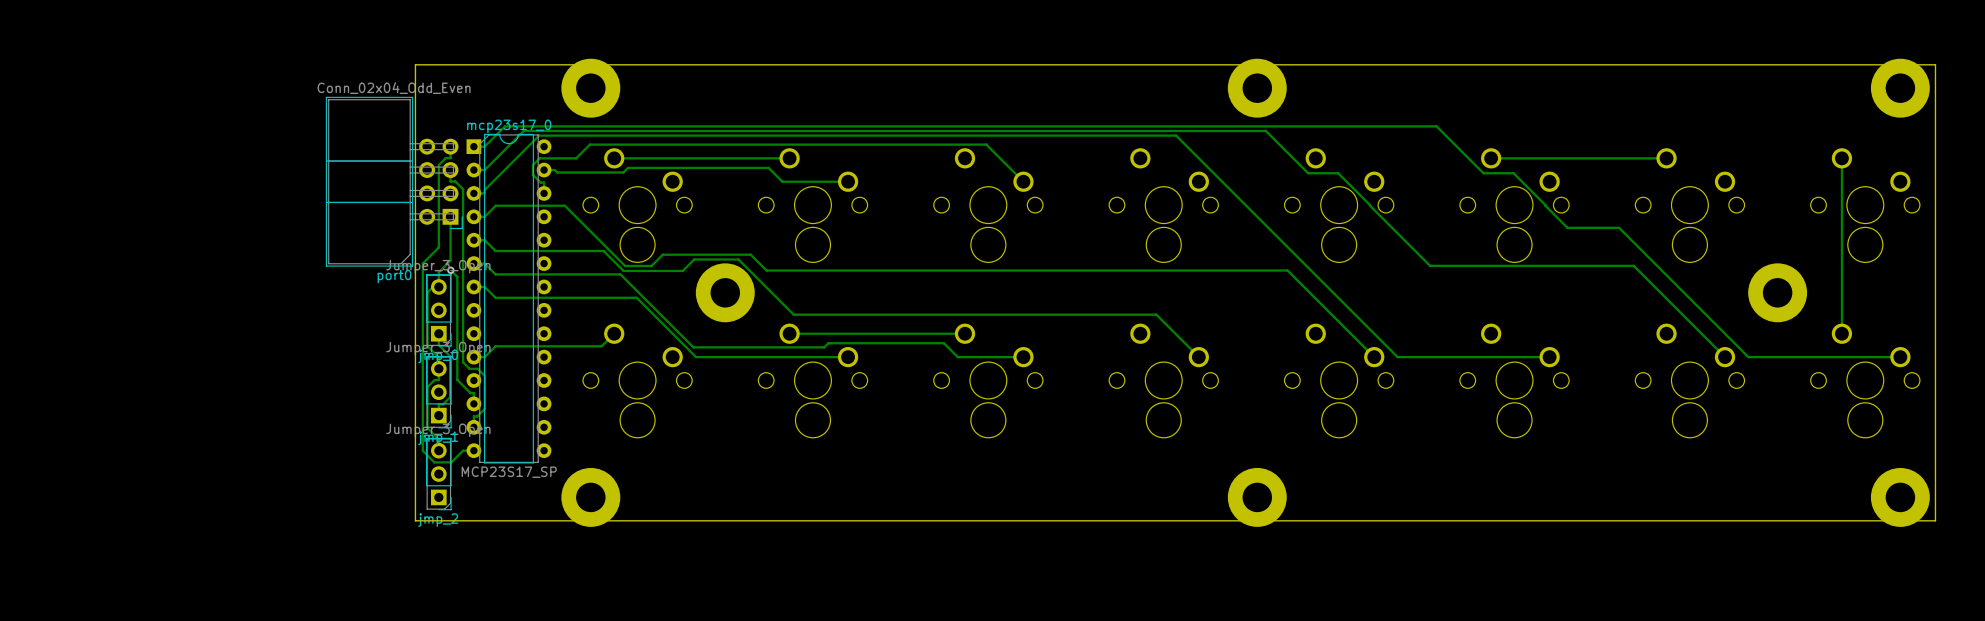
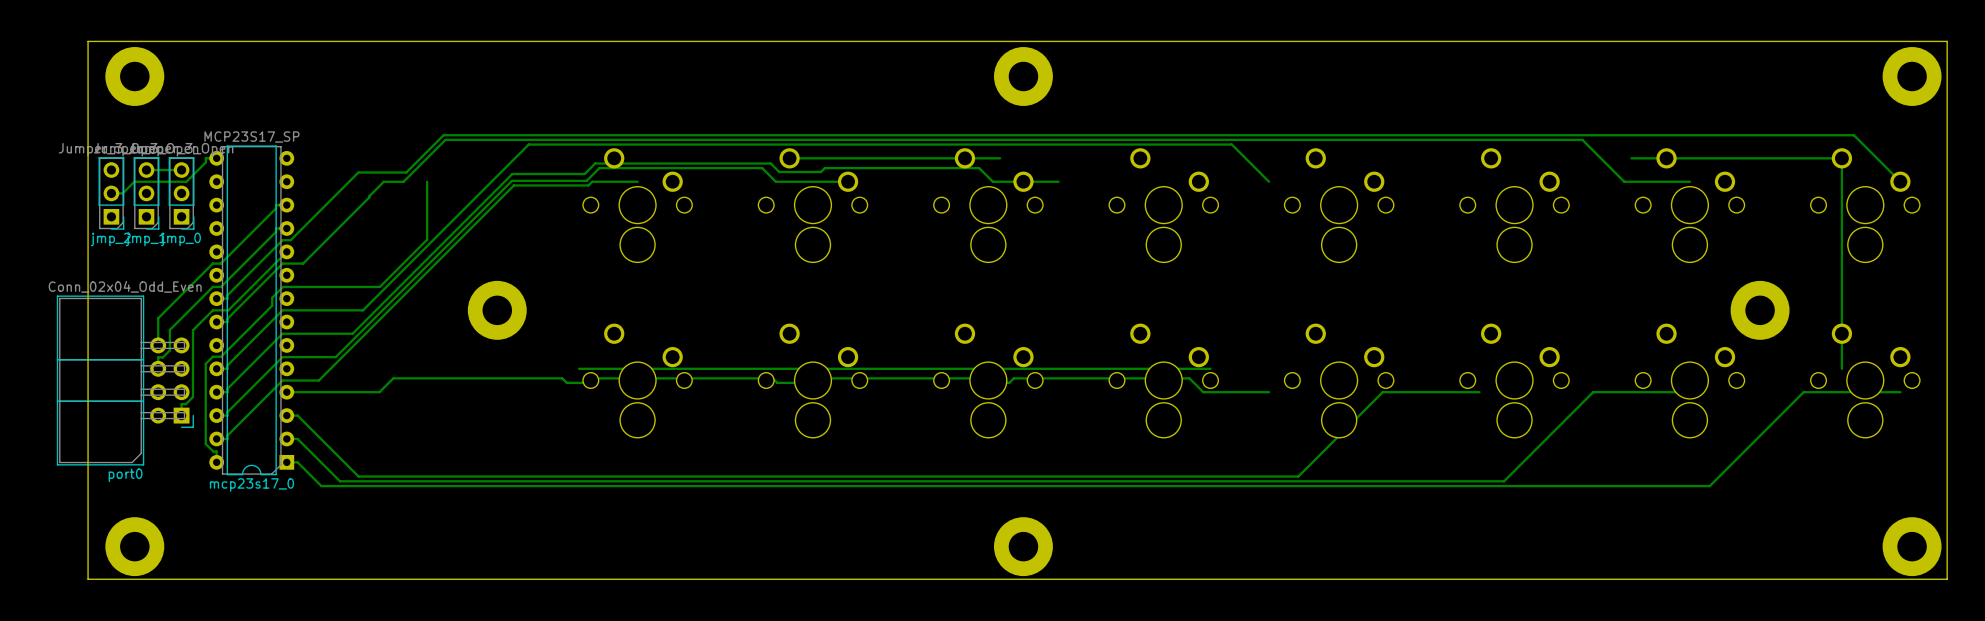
board edge: (1935, 64) (1935, 520) (415, 520) (415, 64) (1935, 64) -> (1947, 41) (1947, 579) (88, 579) (88, 41) (1947, 41)
part: none -> (134, 76)
part: none -> (1023, 76)
part: (590, 88) -> none
part: (1257, 88) -> none
part position: (1900, 88) -> (1912, 76)
track: (450, 146) (450, 158) (445, 158) (438, 165) (438, 247) (422, 263) (422, 450) (434, 462) (451, 462) (463, 450) (473, 450) -> none
track: (473, 146) (484, 146) (504, 126) (1436, 126) (1483, 173) (1513, 173) (1567, 227) (1619, 227) (1748, 357) (1900, 357) -> none
track: none -> (216, 158) (205, 158) (205, 162) (186, 181) (134, 181) (122, 193) (111, 193)
track: (789, 158) (614, 158) -> (789, 158) (1000, 158)
track: (1631, 158) (1491, 158) -> none
track: none -> (1841, 158) (1666, 158)
track: none -> (181, 170) (146, 170)
track: (450, 170) (450, 181) (455, 181) (463, 189) (463, 362) (469, 368) (477, 368) (484, 375) (484, 408) (477, 416) (473, 416) (473, 427) -> none
track: (473, 170) (484, 170) (523, 130) (1265, 130) (1308, 173) (1338, 173) (1430, 265) (1633, 265) (1725, 357) -> none
track: (544, 170) (554, 170) (557, 172) (623, 172) (628, 167) (768, 167) (782, 181) -> (216, 415) (227, 415) (227, 412) (282, 357) (335, 357) (512, 180) (586, 180) (599, 168) (762, 168) (775, 181) (782, 181)
port0 position: (394, 181) -> (125, 380)
track: none -> (427, 181) (427, 239) (379, 286) (283, 286) (272, 297) (272, 305) (221, 356) (212, 356) (205, 363) (205, 444) (213, 451) (216, 451) (216, 462)
track: none -> (637, 181) (592, 181) (588, 185) (513, 185) (318, 380) (282, 380) (227, 435) (227, 438) (216, 438)
track: (1023, 181) (986, 144) (589, 144) (576, 158) (539, 158) (533, 165) (533, 174) (540, 182) (544, 182) (544, 193) -> none
track: none -> (1058, 181) (992, 181) (979, 168) (824, 168) (820, 171) (779, 171) (770, 163) (595, 163) (584, 173) (512, 173) (352, 333) (282, 333) (227, 388) (227, 392) (216, 392)
track: none -> (1268, 181) (1231, 144) (528, 144) (362, 310) (282, 310) (227, 365) (227, 368) (216, 368)
track: none -> (1689, 181) (1624, 181) (1582, 139) (445, 139) (403, 181) (383, 181) (303, 263) (282, 263) (227, 318) (227, 322) (216, 322)
track: none -> (1900, 181) (1853, 135) (443, 135) (406, 172) (358, 172) (290, 240) (282, 240) (227, 295) (227, 298) (216, 298)
track: (473, 193) (484, 193) (484, 190) (539, 135) (1176, 135) (1397, 357) (1549, 357) -> none
track: none -> (286, 205) (276, 205) (276, 208) (220, 263) (212, 263) (158, 318) (158, 345)
track: (450, 216) (450, 260) (438, 272) (438, 286) -> none
track: (473, 216) (484, 216) (495, 205) (564, 205) (625, 265) (651, 265) (662, 254) (750, 254) (766, 270) (1287, 270) (1374, 357) -> none
track: none -> (286, 228) (276, 228) (276, 231) (220, 286) (212, 286) (169, 329) (169, 350) (162, 357) (158, 357) (158, 368)
track: (473, 240) (484, 240) (495, 251) (603, 251) (623, 270) (682, 270) (694, 259) (738, 259) (793, 314) (1156, 314) (1198, 357) -> none
track: none -> (286, 251) (228, 310) (212, 310) (192, 330) (192, 397) (185, 404) (181, 404) (181, 415)
track: (473, 263) (484, 263) (495, 274) (620, 274) (693, 347) (824, 347) (828, 343) (943, 343) (957, 357) (1023, 357) -> none
track: (450, 270) (457, 276) (457, 379) (470, 393) (473, 393) (473, 403) -> none
via: (450, 270) -> none
track: (438, 281) (427, 292) (427, 346) (438, 357) (438, 380) (434, 380) (427, 387) (427, 428) (438, 439) (438, 450) -> none
track: (473, 286) (484, 286) (495, 297) (636, 297) (696, 357) (848, 357) -> none
part: (725, 292) -> none
part position: (1777, 292) -> (1760, 310)
mcp23s17_0 rotation: 0° (508, 298) -> 180° (251, 310)
mcp23s17_0 position: (508, 298) -> (251, 310)
jmp_0 position: (438, 310) -> (181, 193)
part: none -> (497, 310)
track: (438, 333) (438, 345) (450, 356) (450, 397) (443, 404) (438, 404) (438, 415) -> none
track: (614, 333) (601, 346) (495, 346) (484, 357) (473, 357) -> none
track: (964, 333) (789, 333) -> none
track: none -> (1841, 333) (1841, 368)
track: none -> (1210, 368) (579, 368)
jmp_1 position: (438, 392) -> (146, 193)
track: none -> (1268, 392) (1203, 392) (1189, 378) (1013, 378) (1009, 382) (987, 382) (983, 378) (803, 378) (798, 382) (777, 382) (772, 378) (592, 378) (588, 382) (566, 382) (562, 378) (393, 378) (379, 392) (286, 392)
track: none -> (1479, 392) (1382, 392) (1298, 476) (358, 476) (297, 415) (286, 415)
track: none -> (1689, 392) (1593, 392) (1504, 481) (339, 481) (297, 438) (286, 438)
track: none -> (1900, 392) (1803, 392) (1709, 486) (321, 486) (297, 462) (286, 462)
jmp_2 position: (438, 474) -> (111, 193)
part: (590, 497) -> none
part: (1257, 497) -> none
part position: (1900, 497) -> (1912, 546)
part: none -> (134, 546)
part: none -> (1023, 546)

